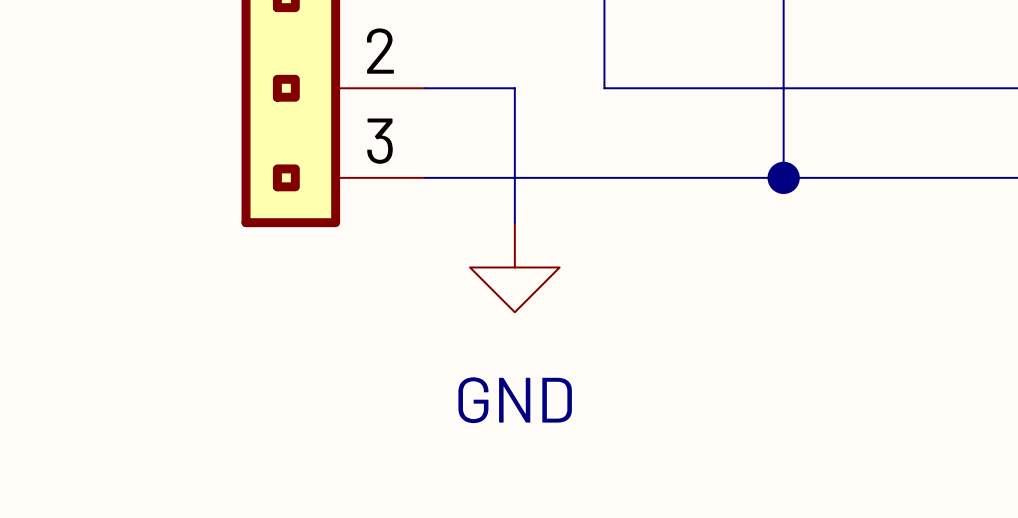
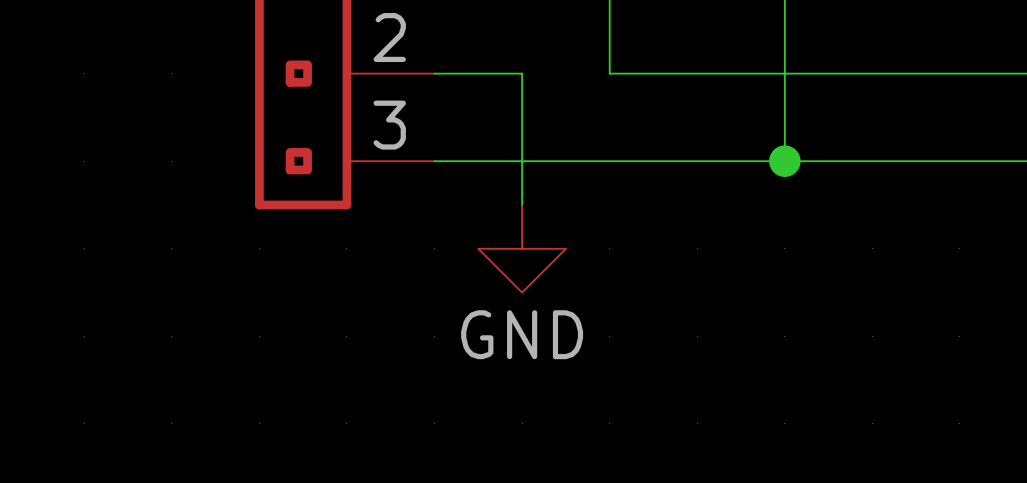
power symbol text position: GND (515, 400) -> GND (522, 334)

